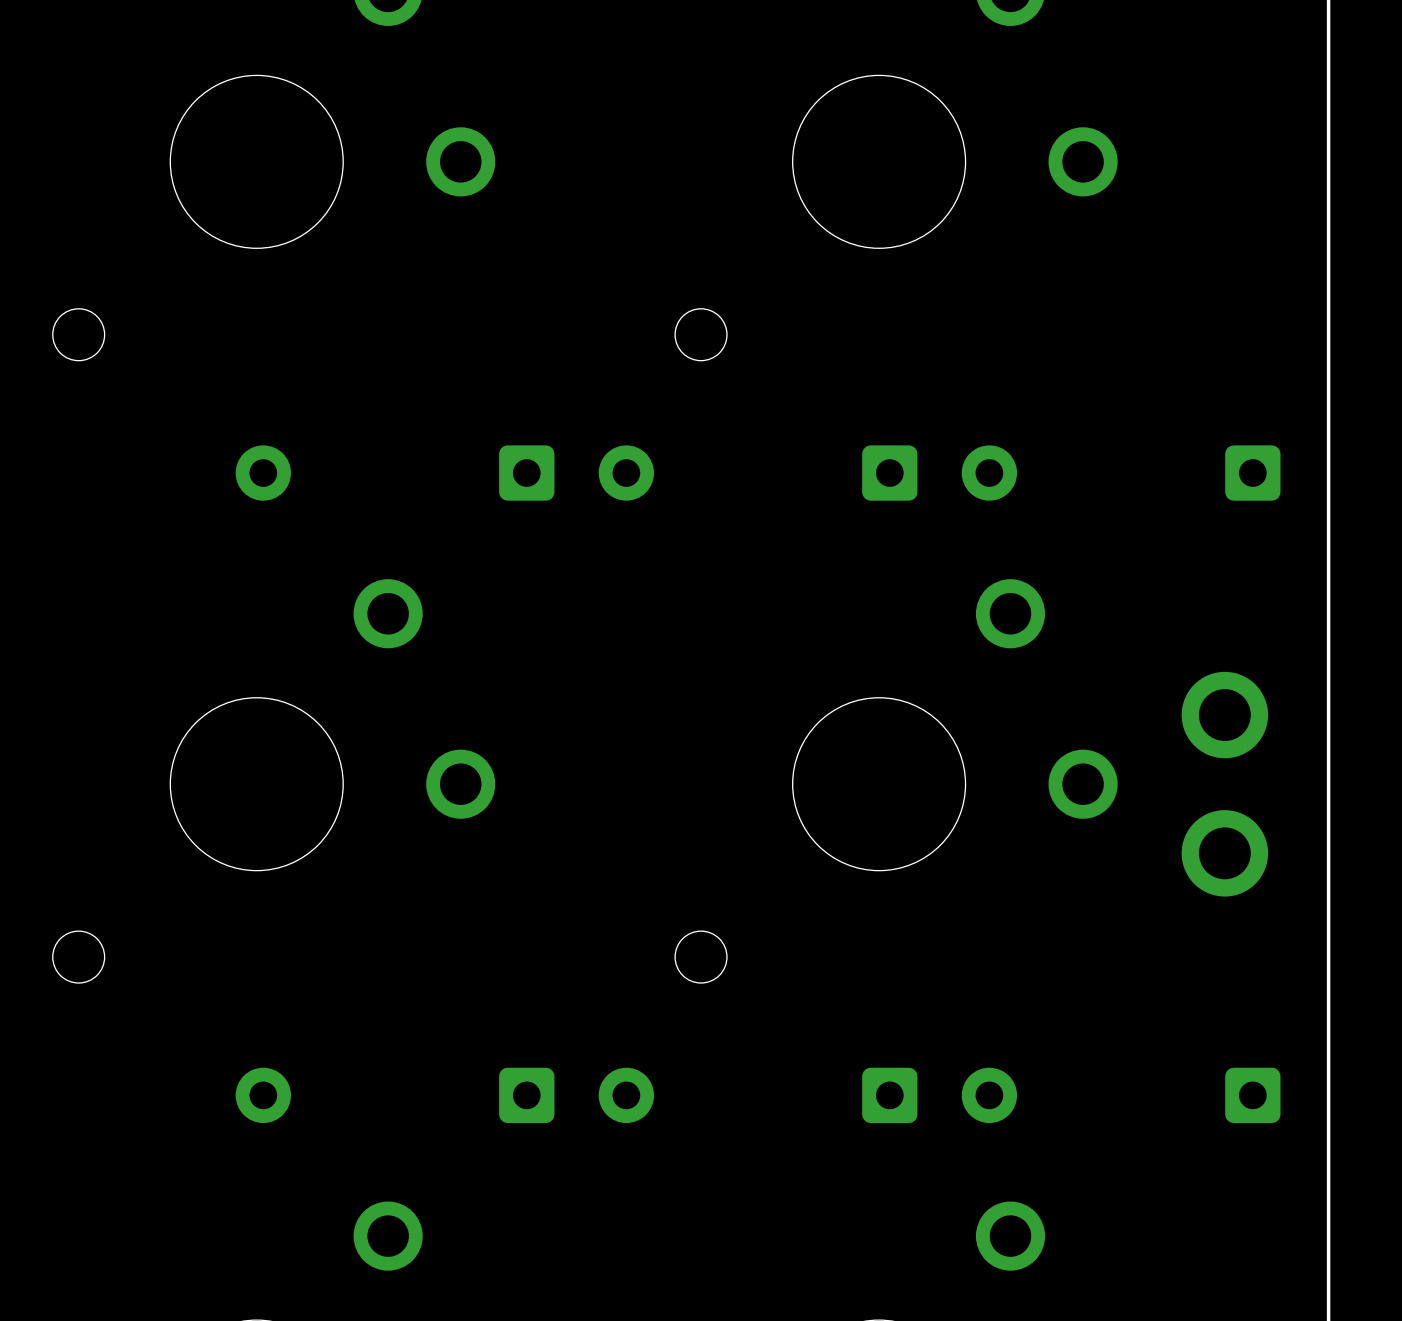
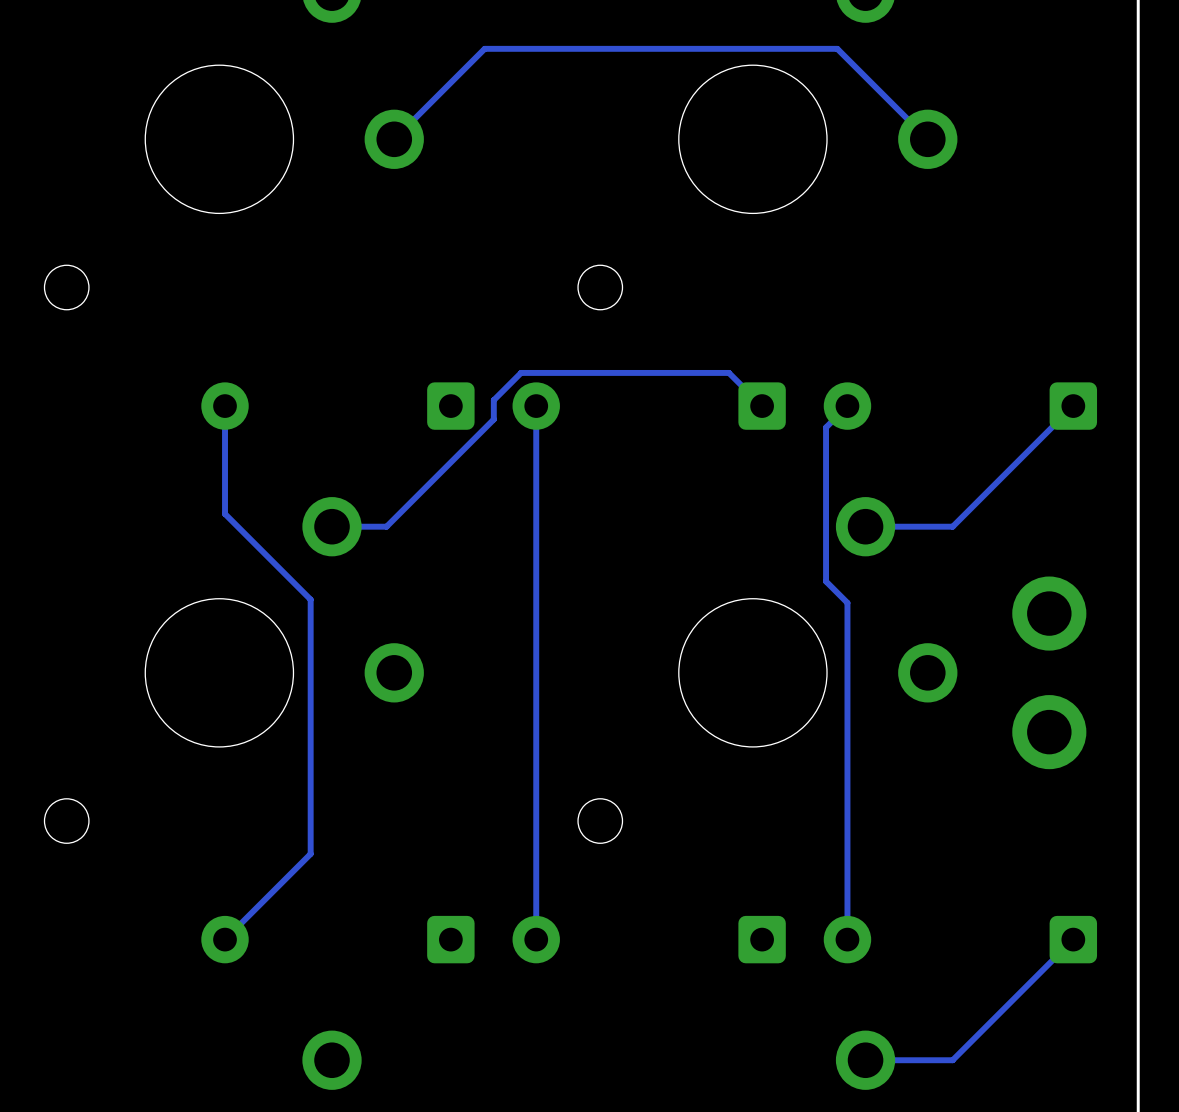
track: none -> (927, 139) (837, 48) (484, 48) (394, 139)
track: none -> (225, 406) (225, 513) (310, 599) (310, 853) (225, 939)
track: none -> (536, 406) (536, 939)
track: none -> (762, 406) (728, 372) (521, 372) (493, 400) (493, 419) (386, 526) (332, 526)
track: none -> (847, 406) (826, 427) (826, 581) (847, 602) (847, 939)
track: none -> (1073, 406) (952, 526) (865, 526)
track: none -> (1073, 939) (952, 1060) (865, 1060)

